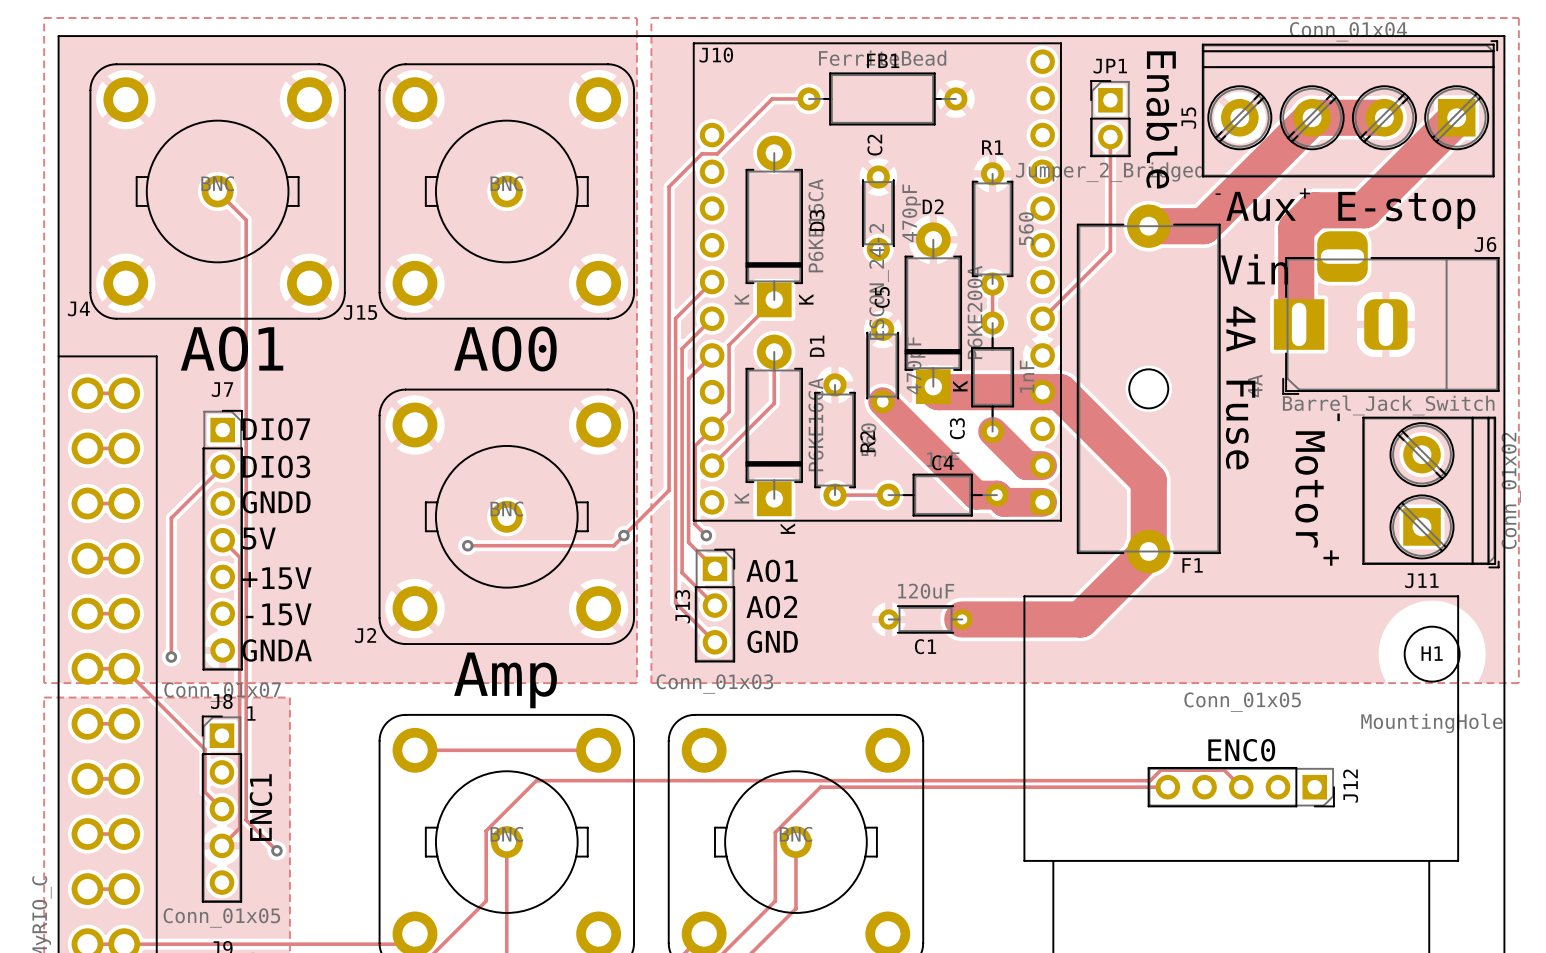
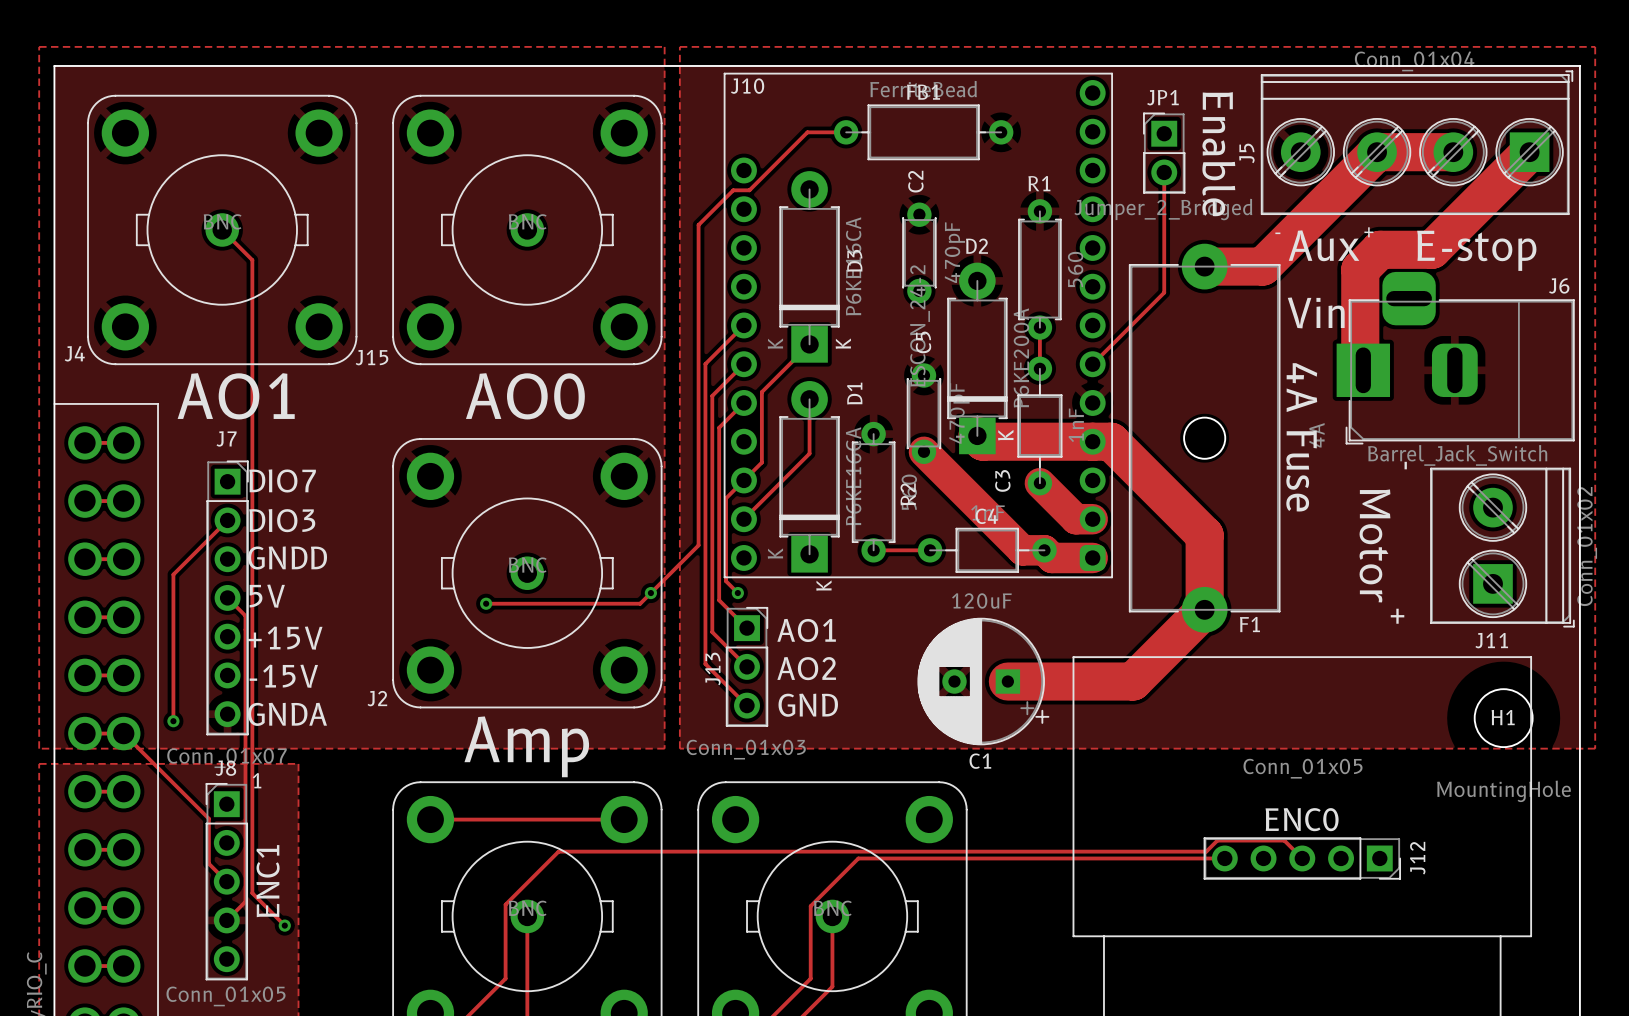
C1 value position: 120uF (926, 591) -> 120uF (981, 600)
C1 footprint: [878, 605, 973, 634] -> [917, 617, 1050, 746]
C1 name position: C1 (925, 646) -> C1 (980, 761)

